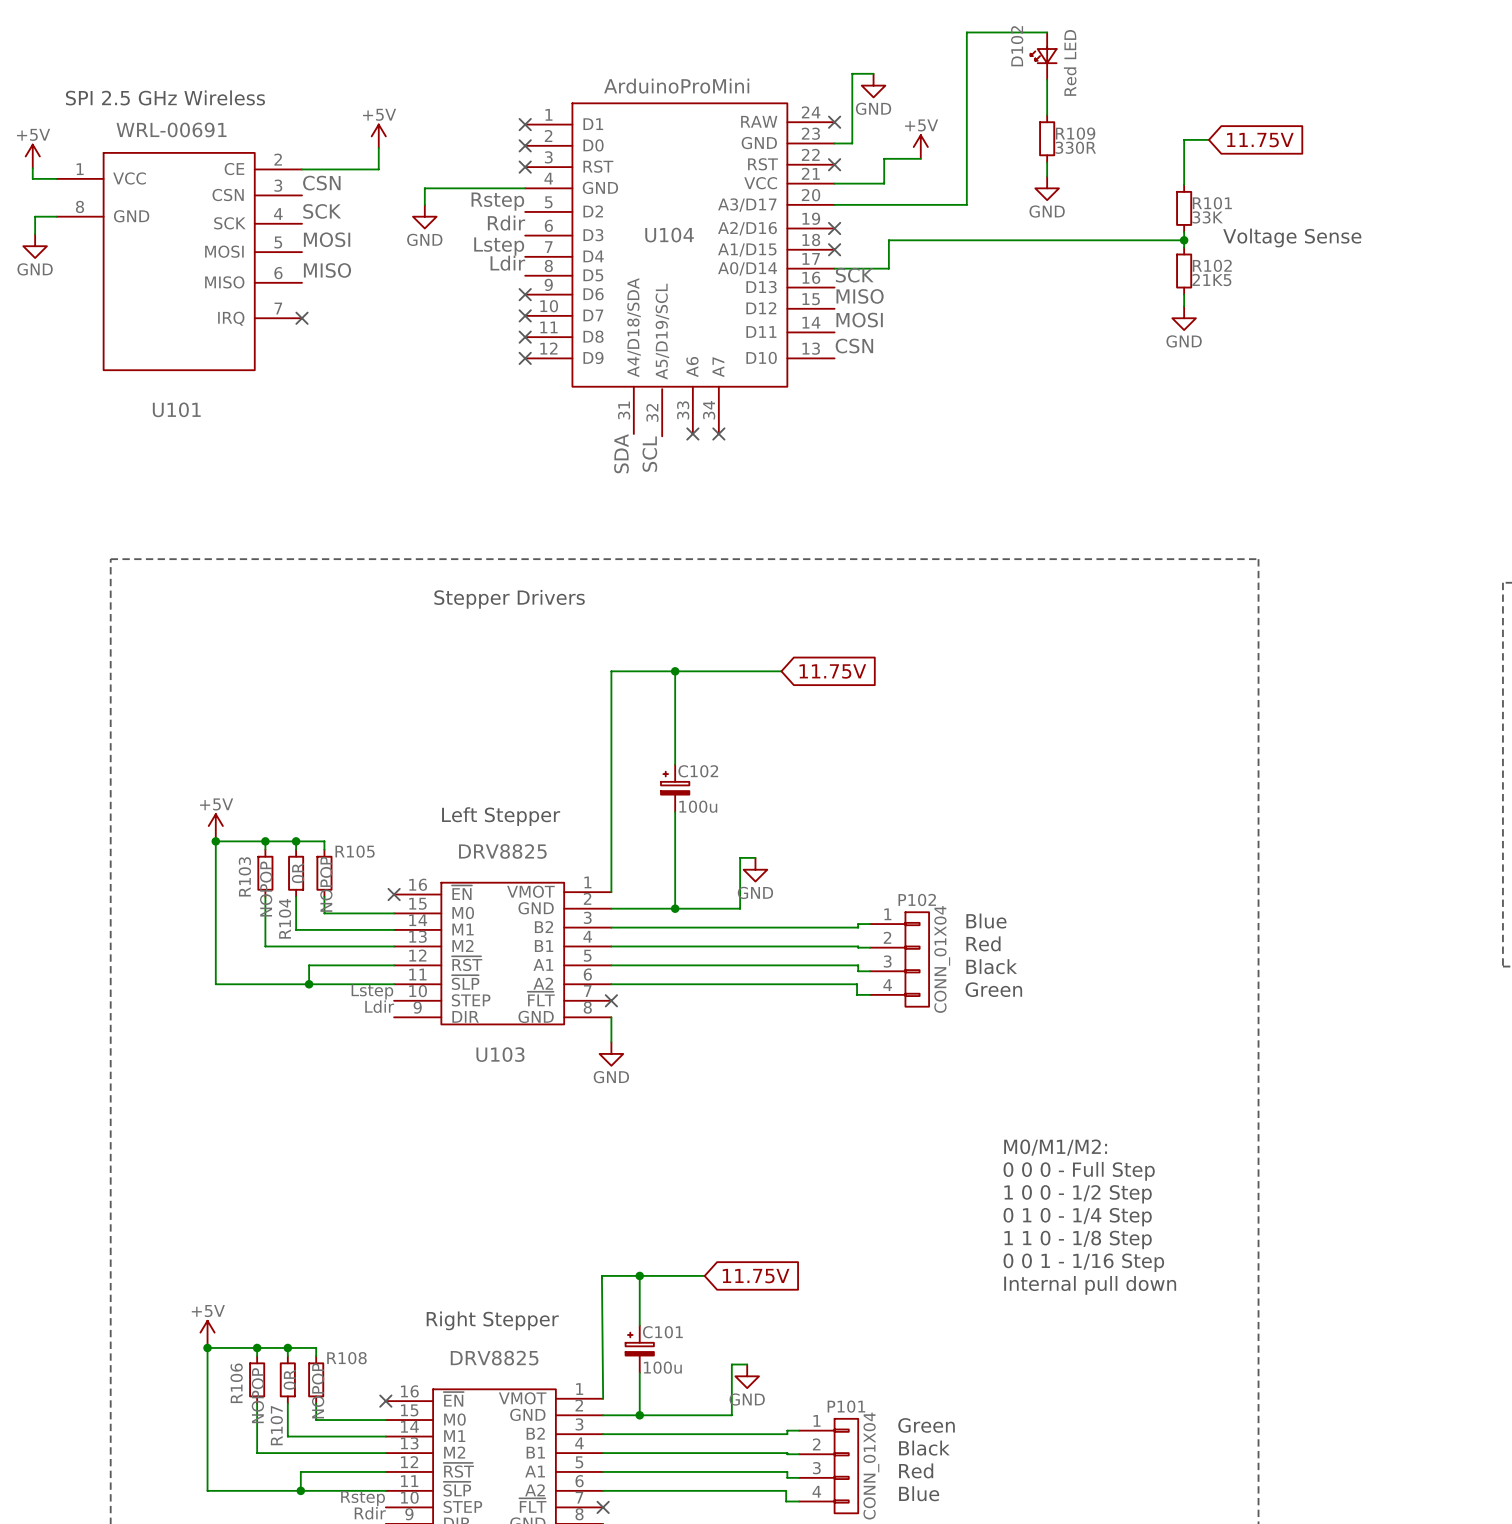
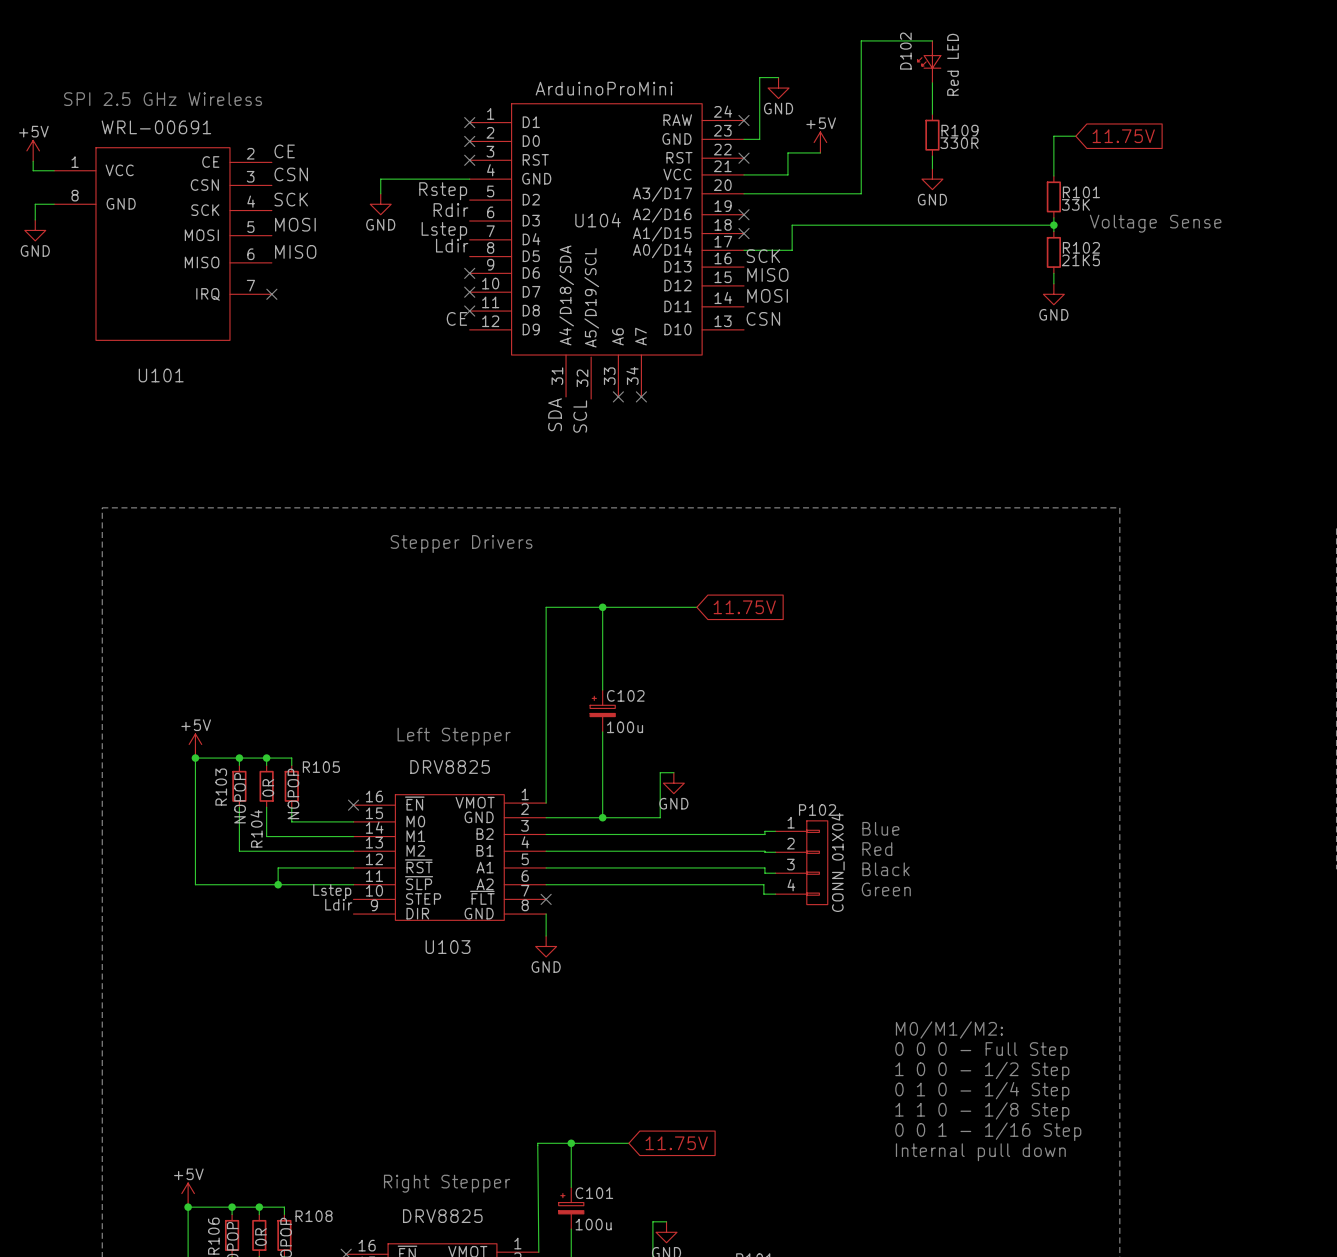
power symbol: +5V (378, 136) -> none
wire: (378, 148) (378, 169) (302, 169) -> none
label: none -> CE (284, 151)
label: none -> CE (456, 318)
no-connect mark: (525, 358) -> none

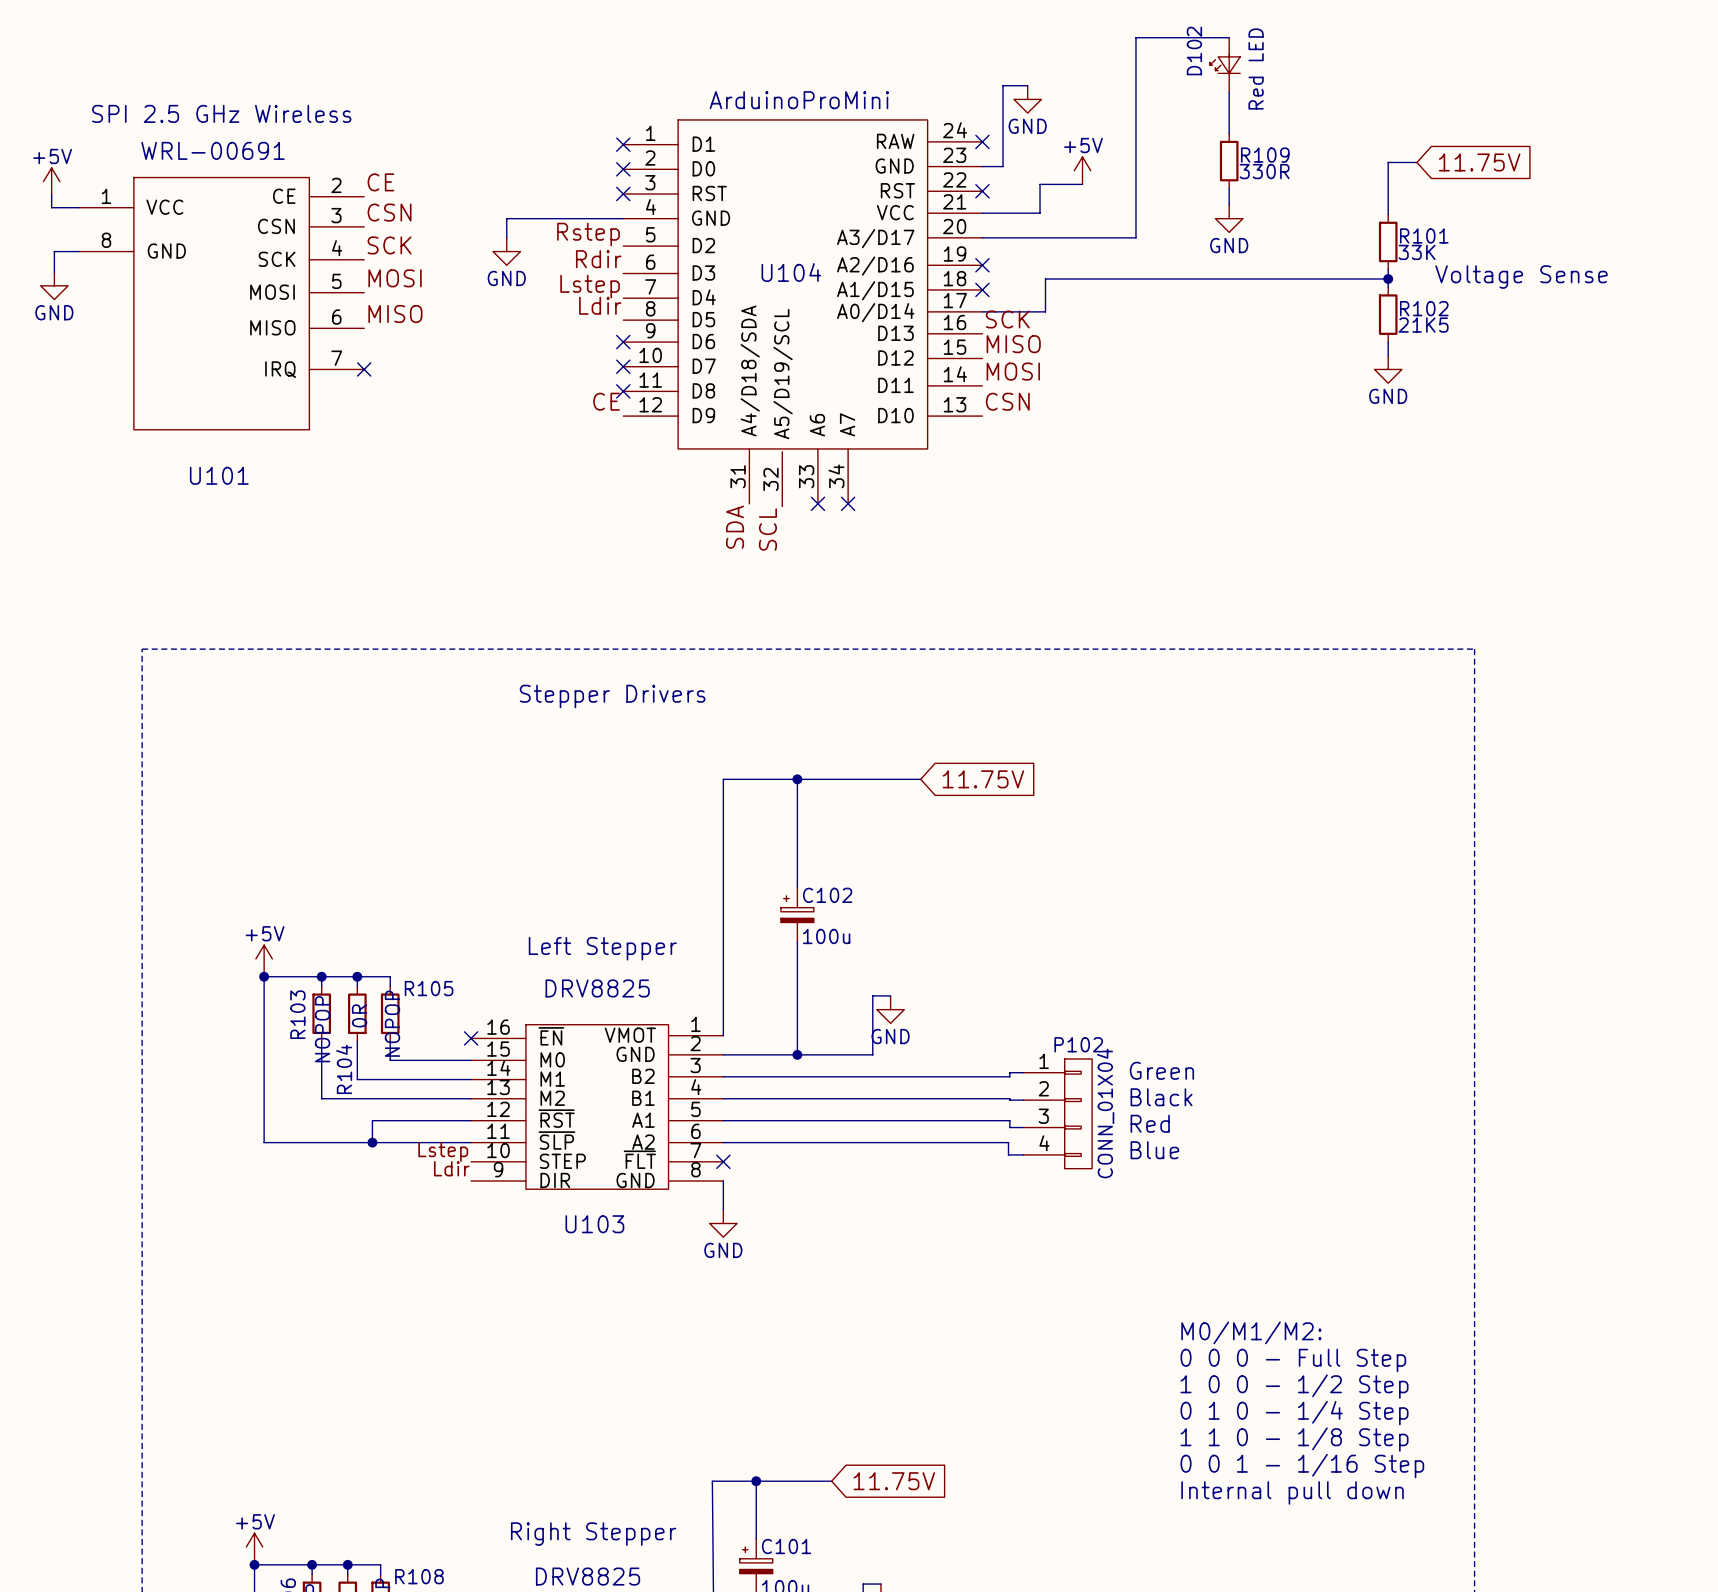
text: Blue (880, 828) -> Green (1161, 1070)
text: Red (877, 849) -> Black (1161, 1097)
text: Black (886, 869) -> Red (1150, 1123)
text: Green (886, 889) -> Blue (1154, 1150)

